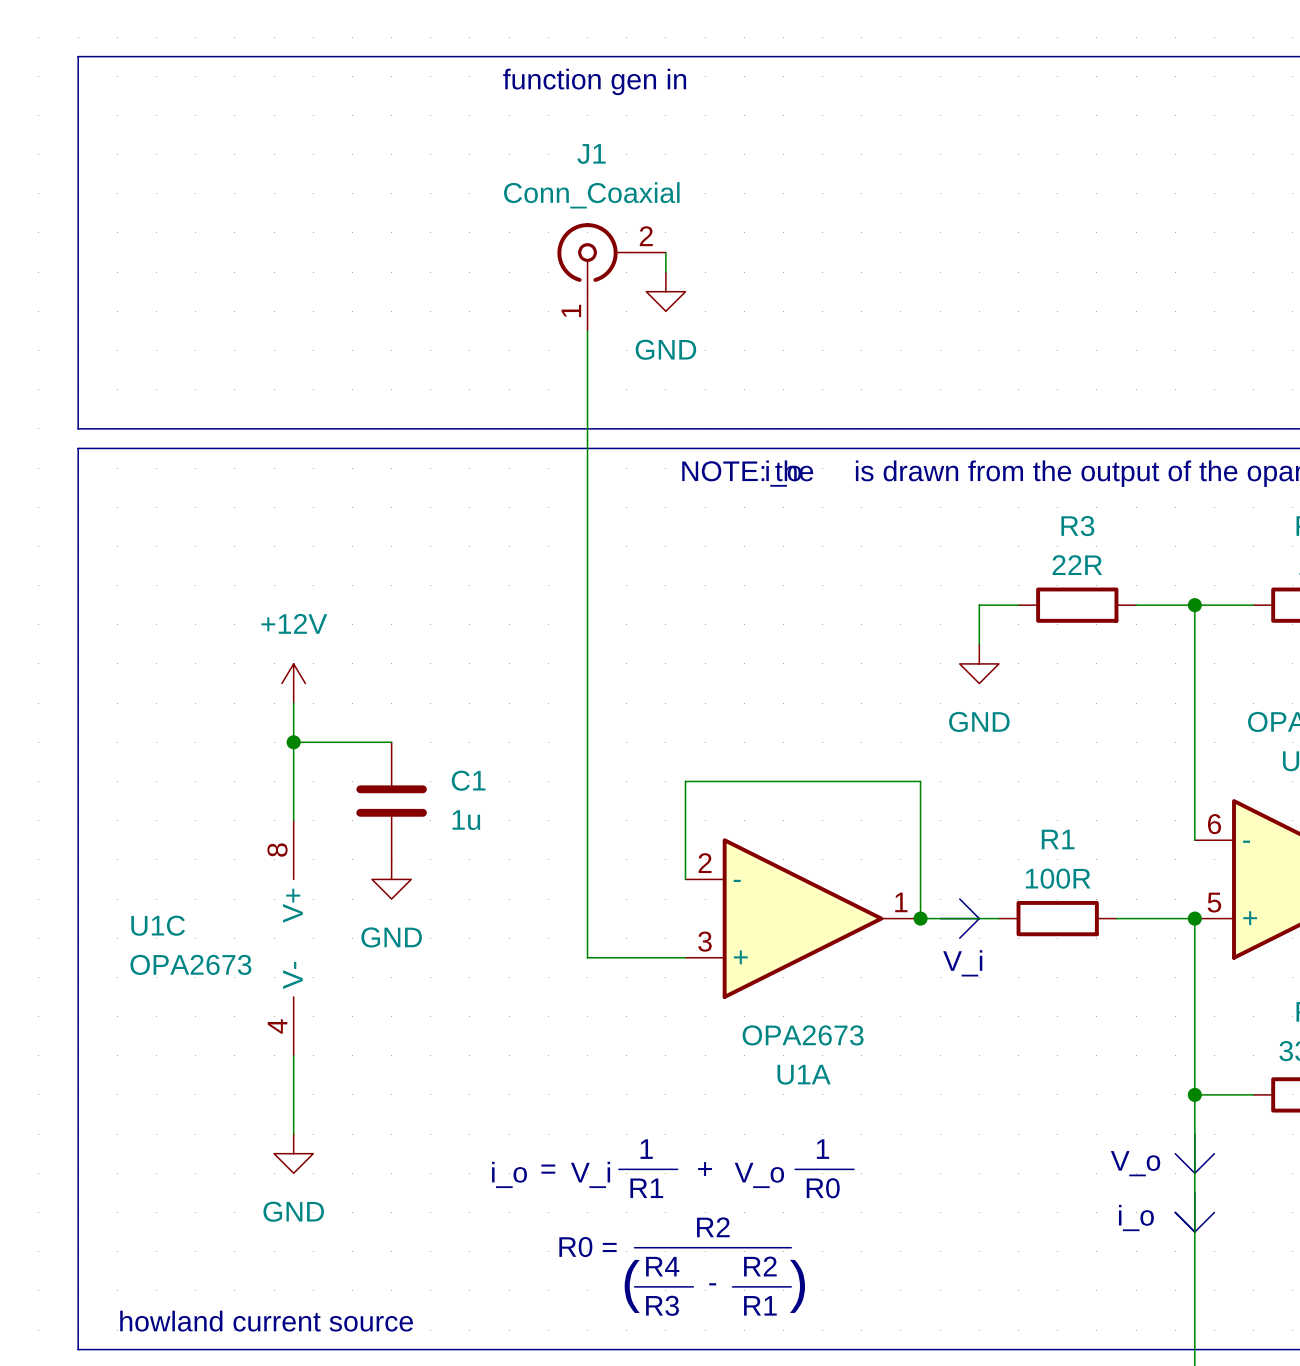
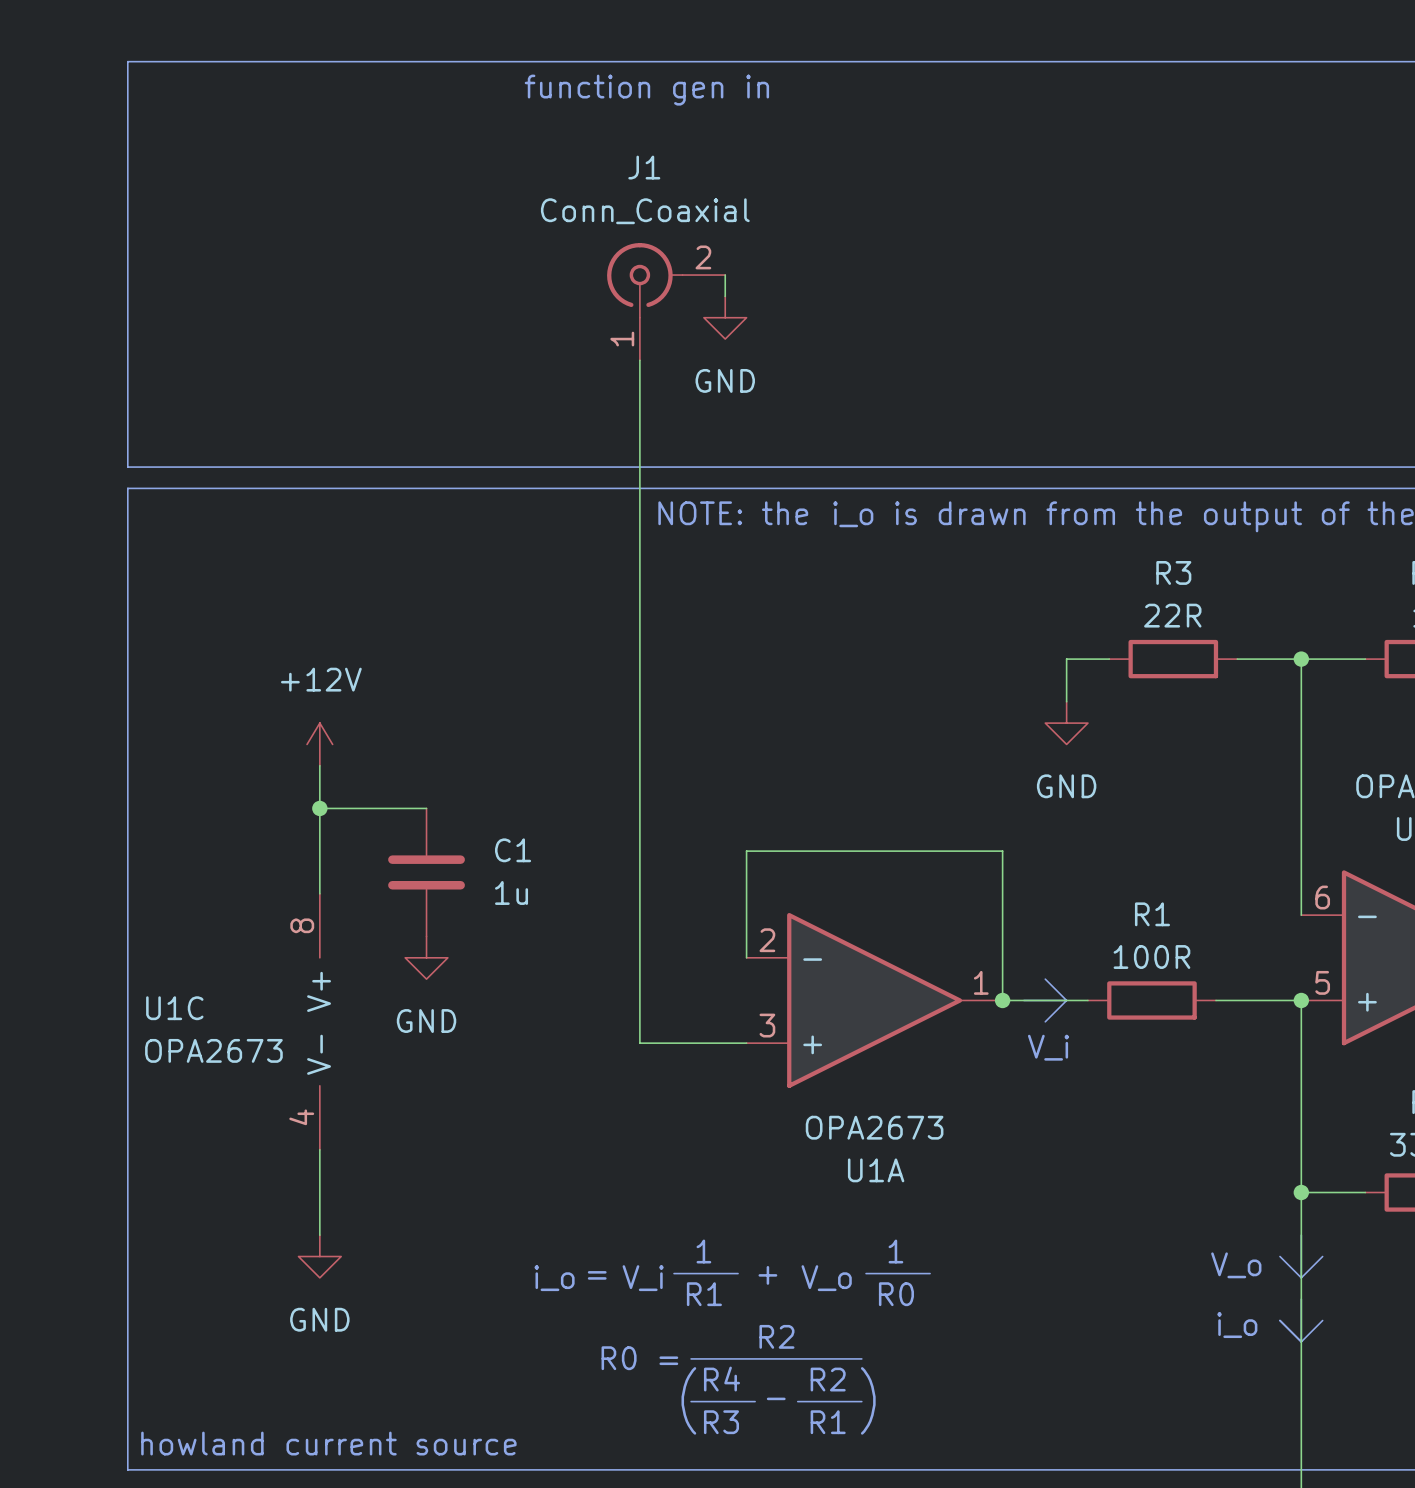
line: (117, 56) (78, 56) (78, 428) (117, 428) -> (127, 61) (127, 467)
line: (117, 448) (78, 448) (78, 1349) (117, 1349) -> (127, 488) (127, 1469)
text position: howland current source (266, 1321) -> howland current source (328, 1443)

